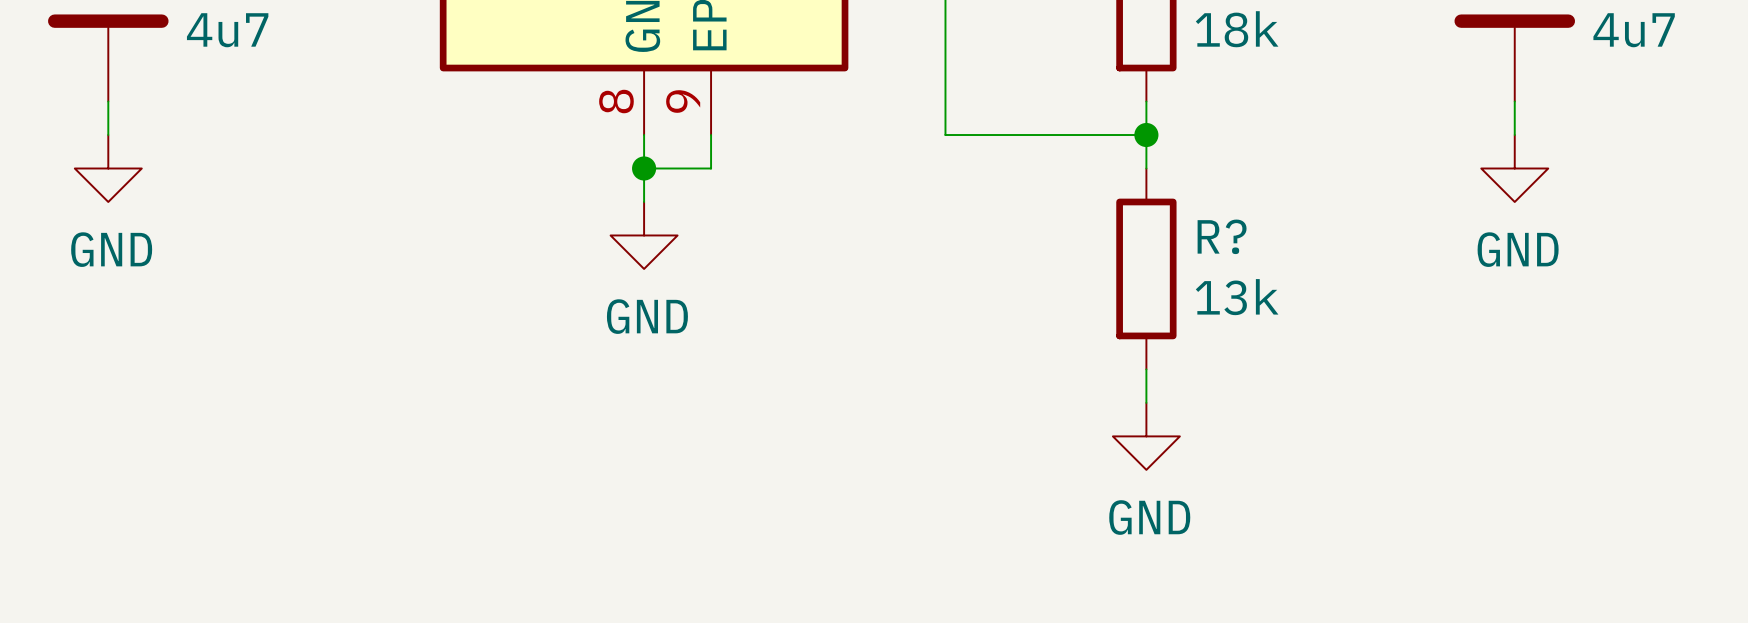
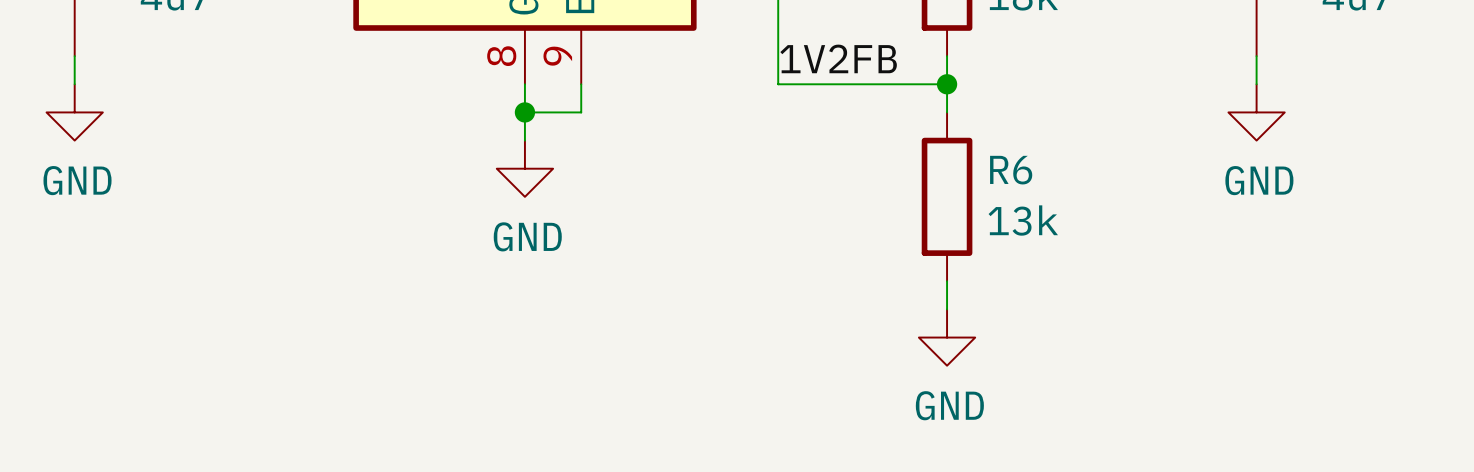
label: none -> 1V2FB (838, 58)
R? name: R? (1222, 236) -> R6 (1011, 170)

